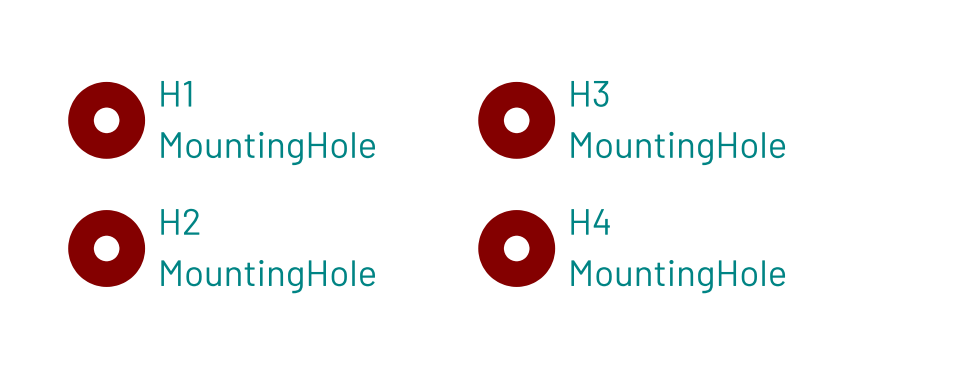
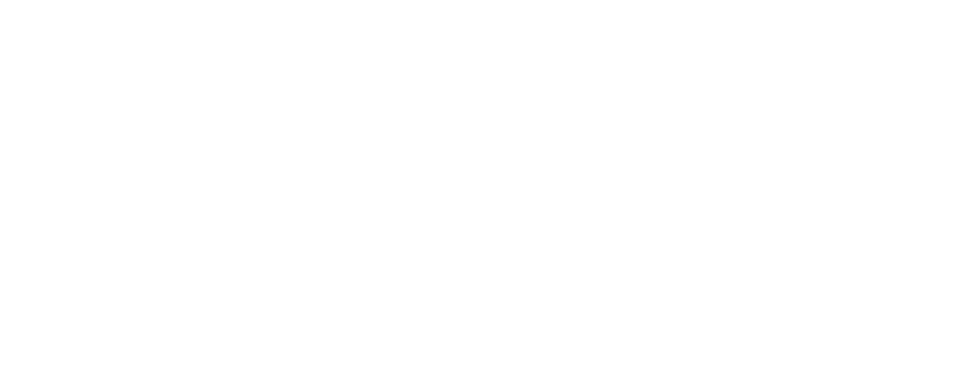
H1: MountingHole (106, 120) -> none
H3: MountingHole (516, 120) -> none
H2: MountingHole (106, 248) -> none
H4: MountingHole (516, 248) -> none

